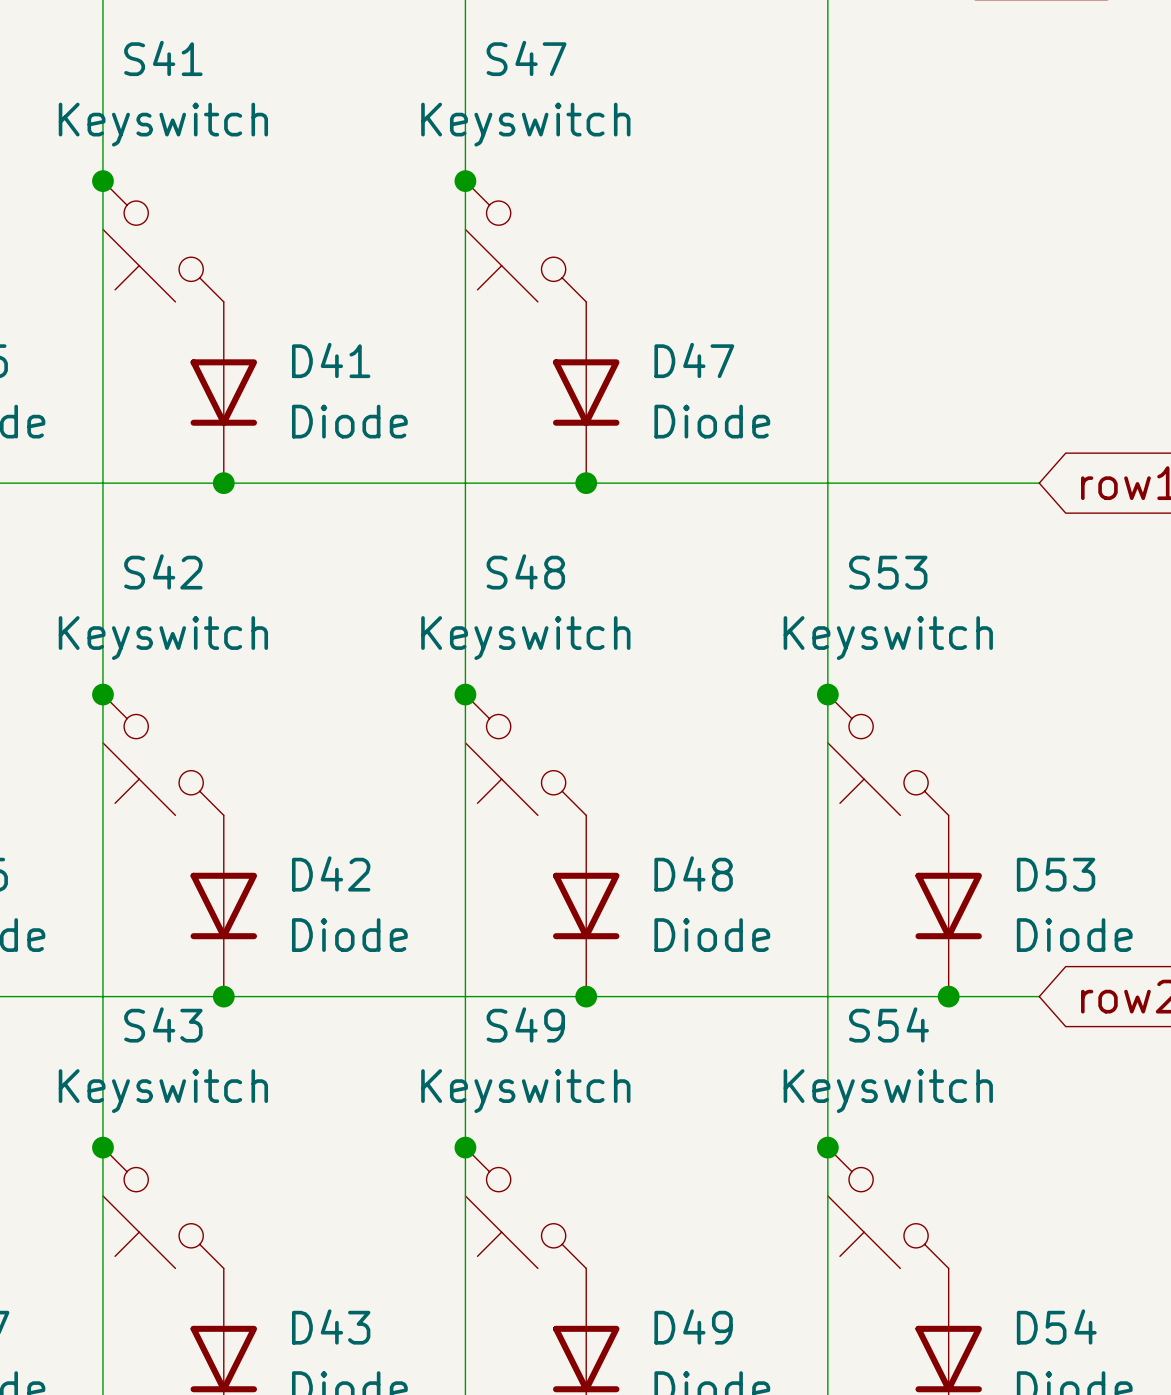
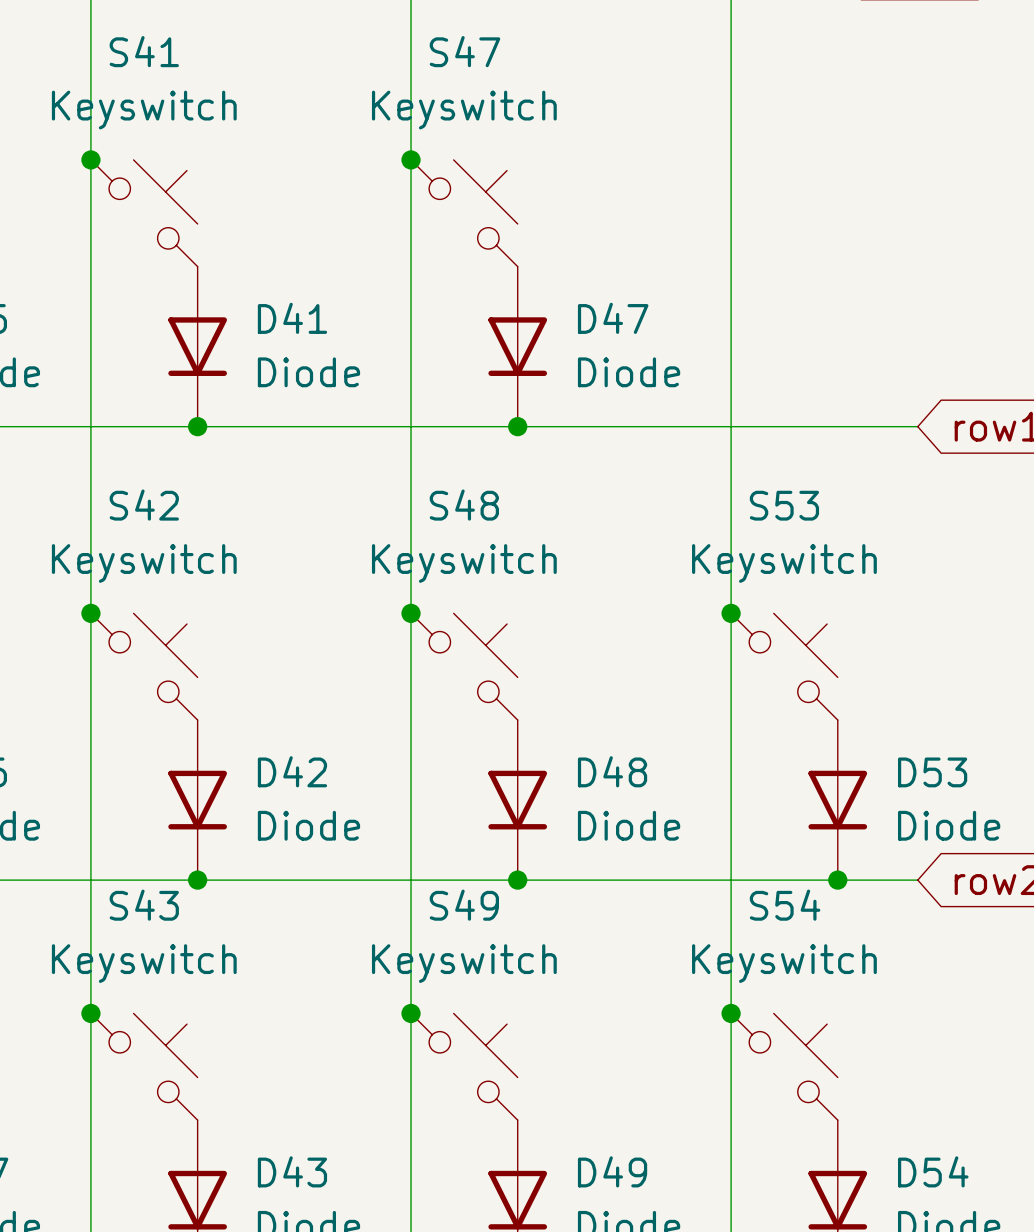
S41 rotation: 0° (163, 241) -> 180° (144, 213)
S47 rotation: 0° (525, 241) -> 180° (464, 213)
S42 rotation: 0° (163, 754) -> 180° (144, 666)
S48 rotation: 0° (525, 754) -> 180° (464, 666)
S53 rotation: 0° (888, 754) -> 180° (784, 666)
S43 rotation: 0° (163, 1208) -> 180° (144, 1066)
S49 rotation: 0° (525, 1208) -> 180° (464, 1066)
S54 rotation: 0° (888, 1208) -> 180° (784, 1066)

